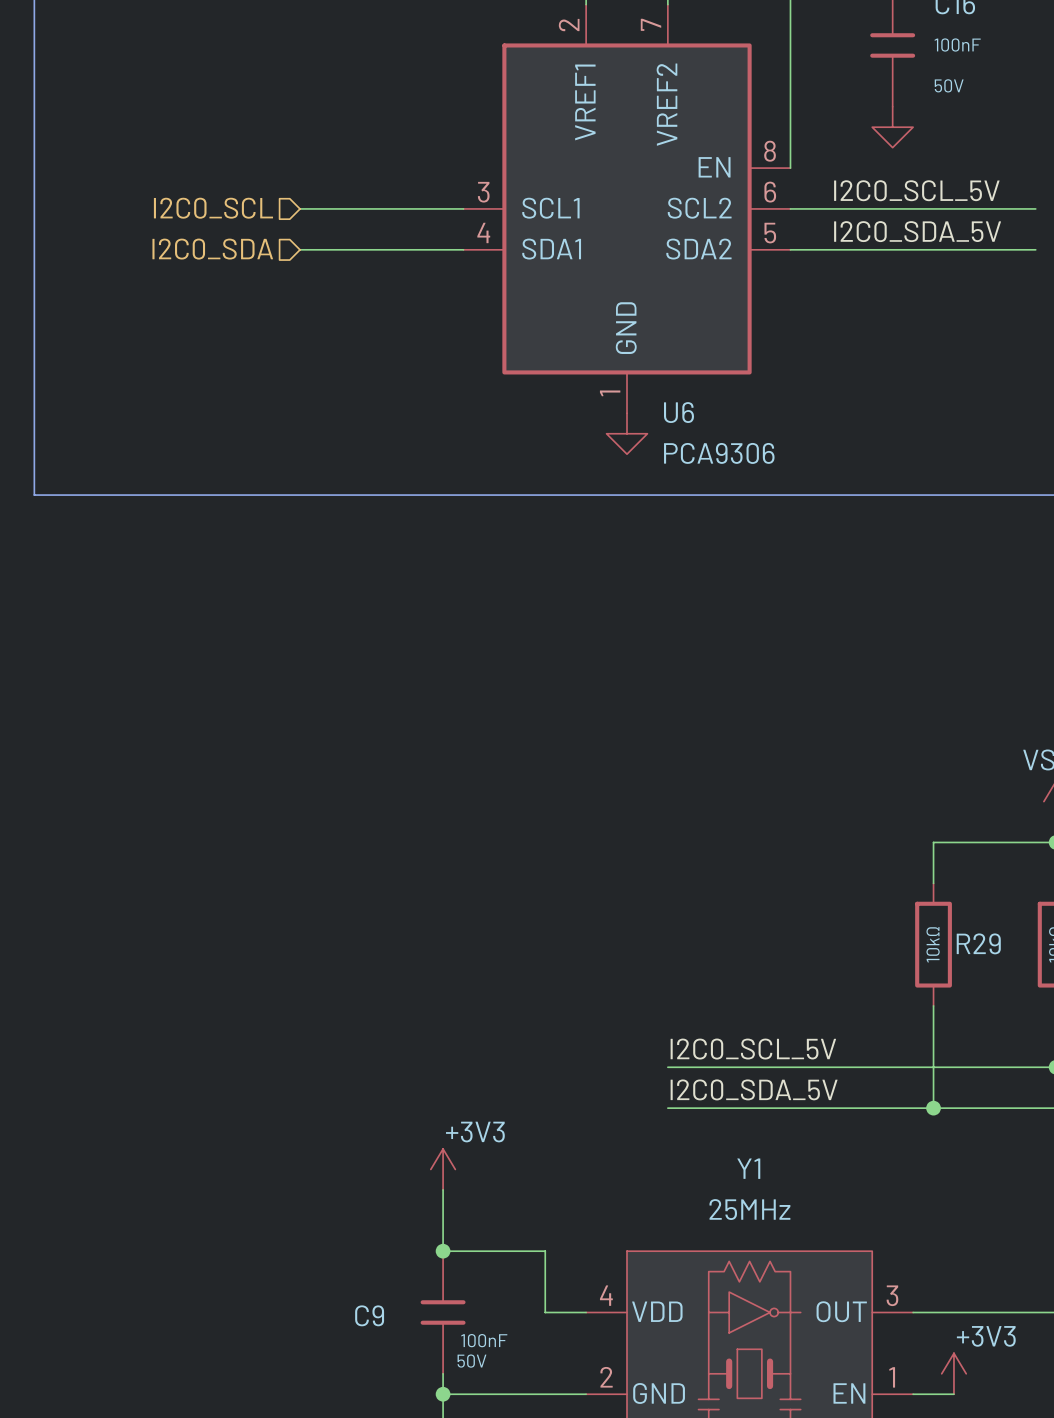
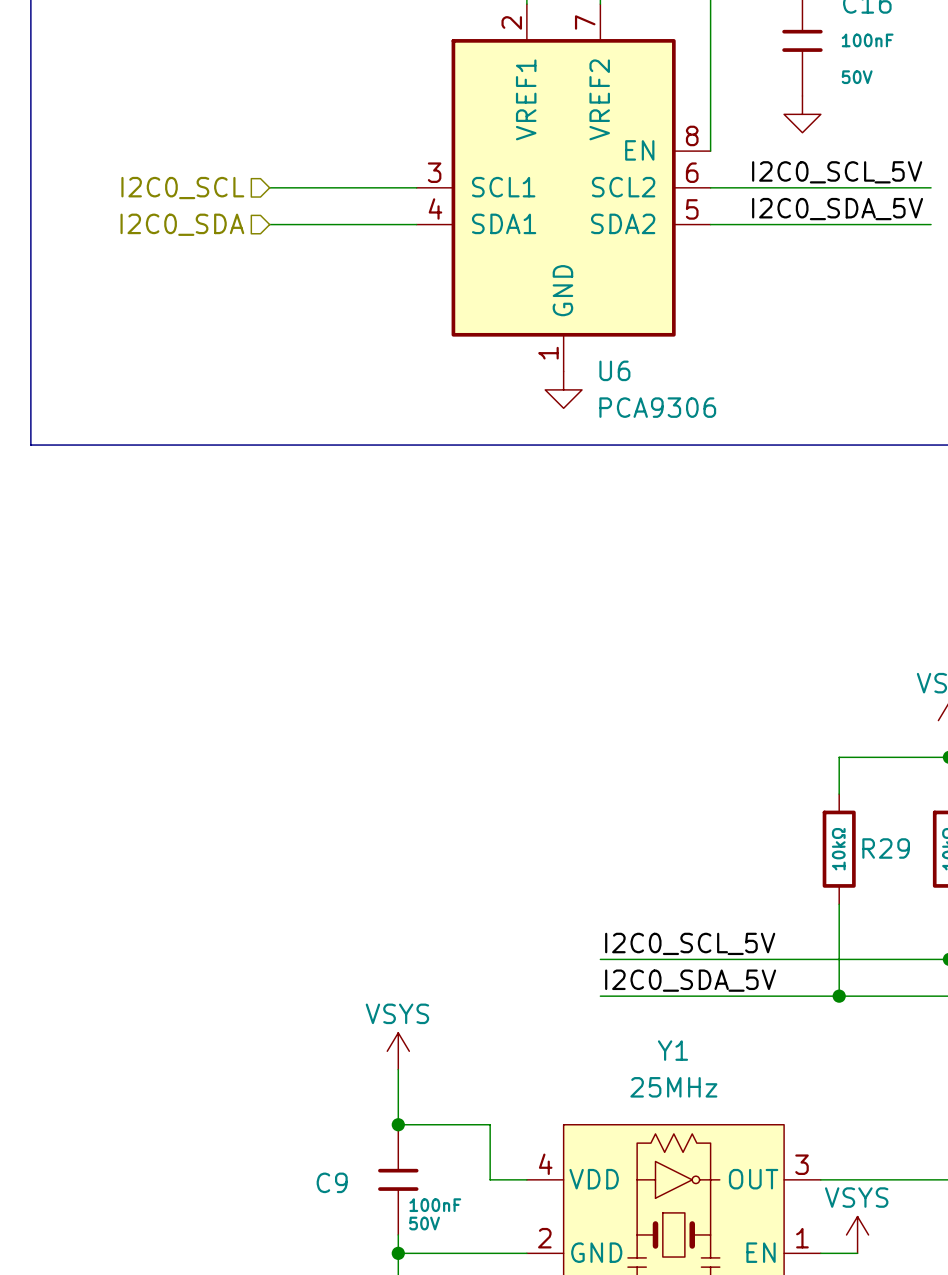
power symbol: +3V3 (443, 1169) -> VSYS (398, 1051)
power symbol: +3V3 (953, 1373) -> VSYS (857, 1234)

